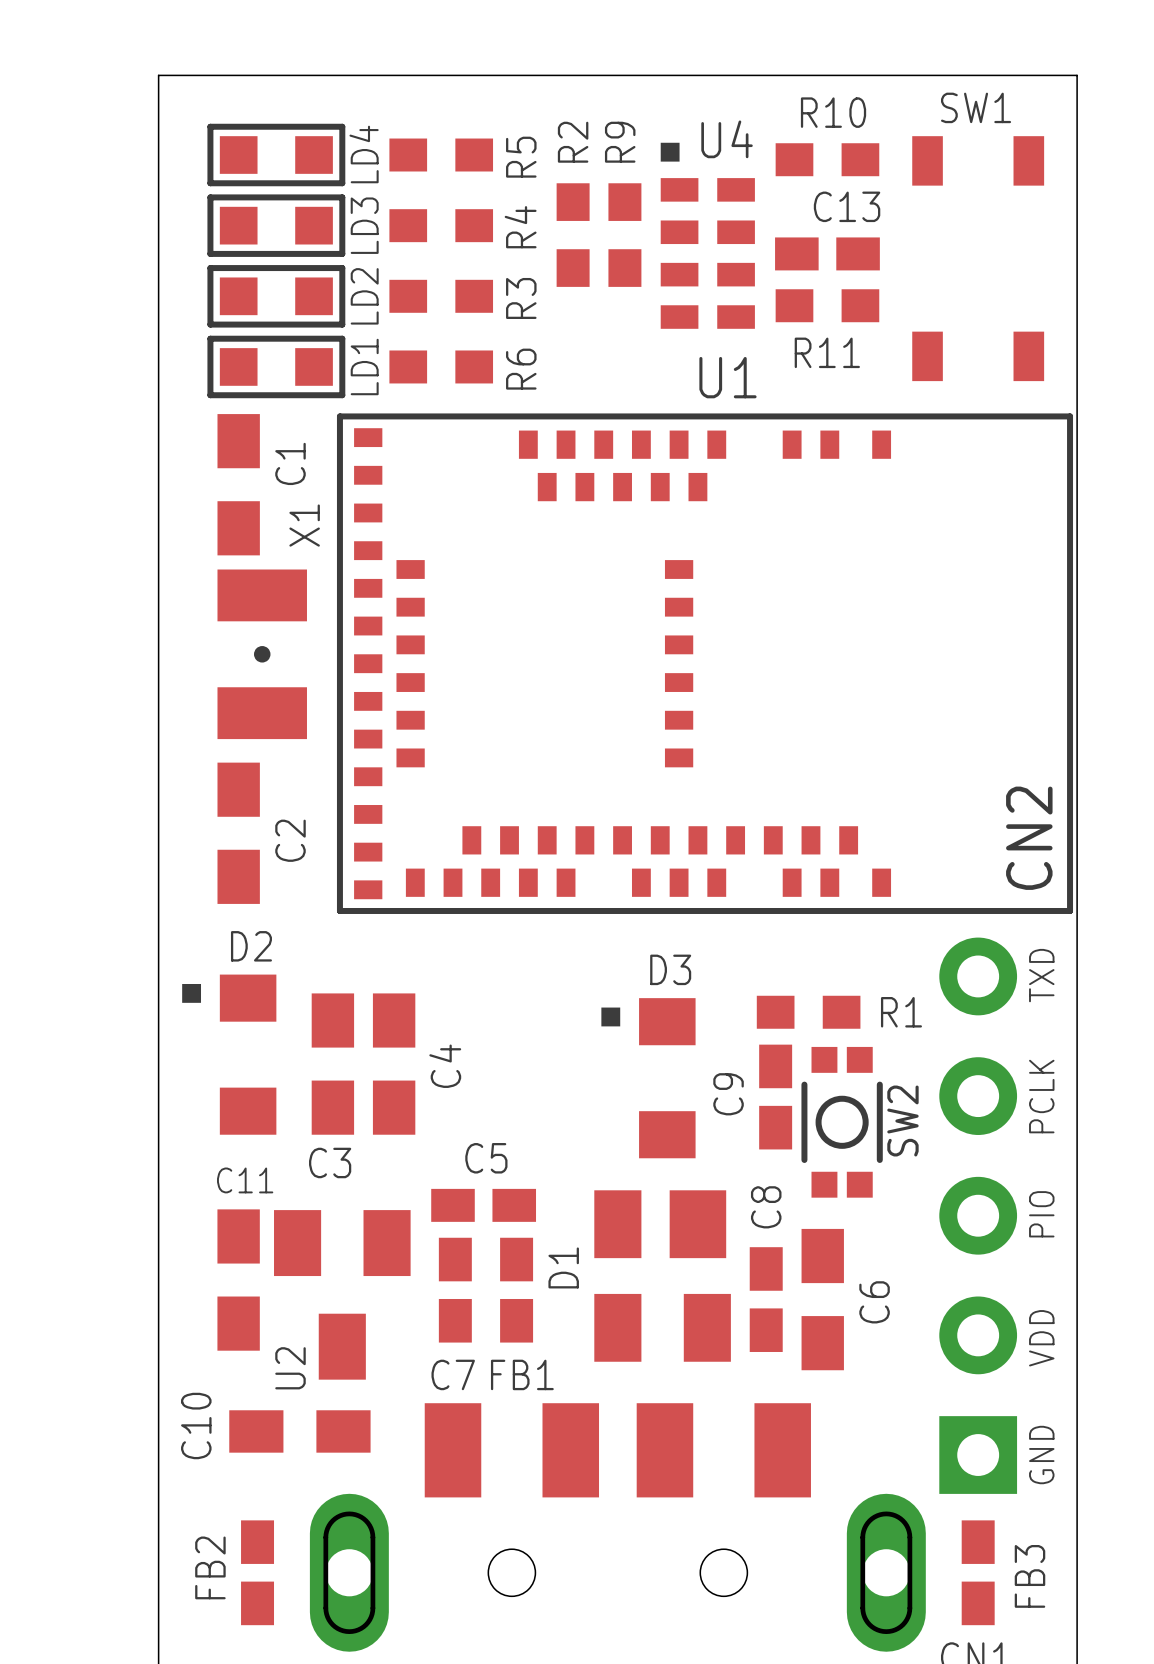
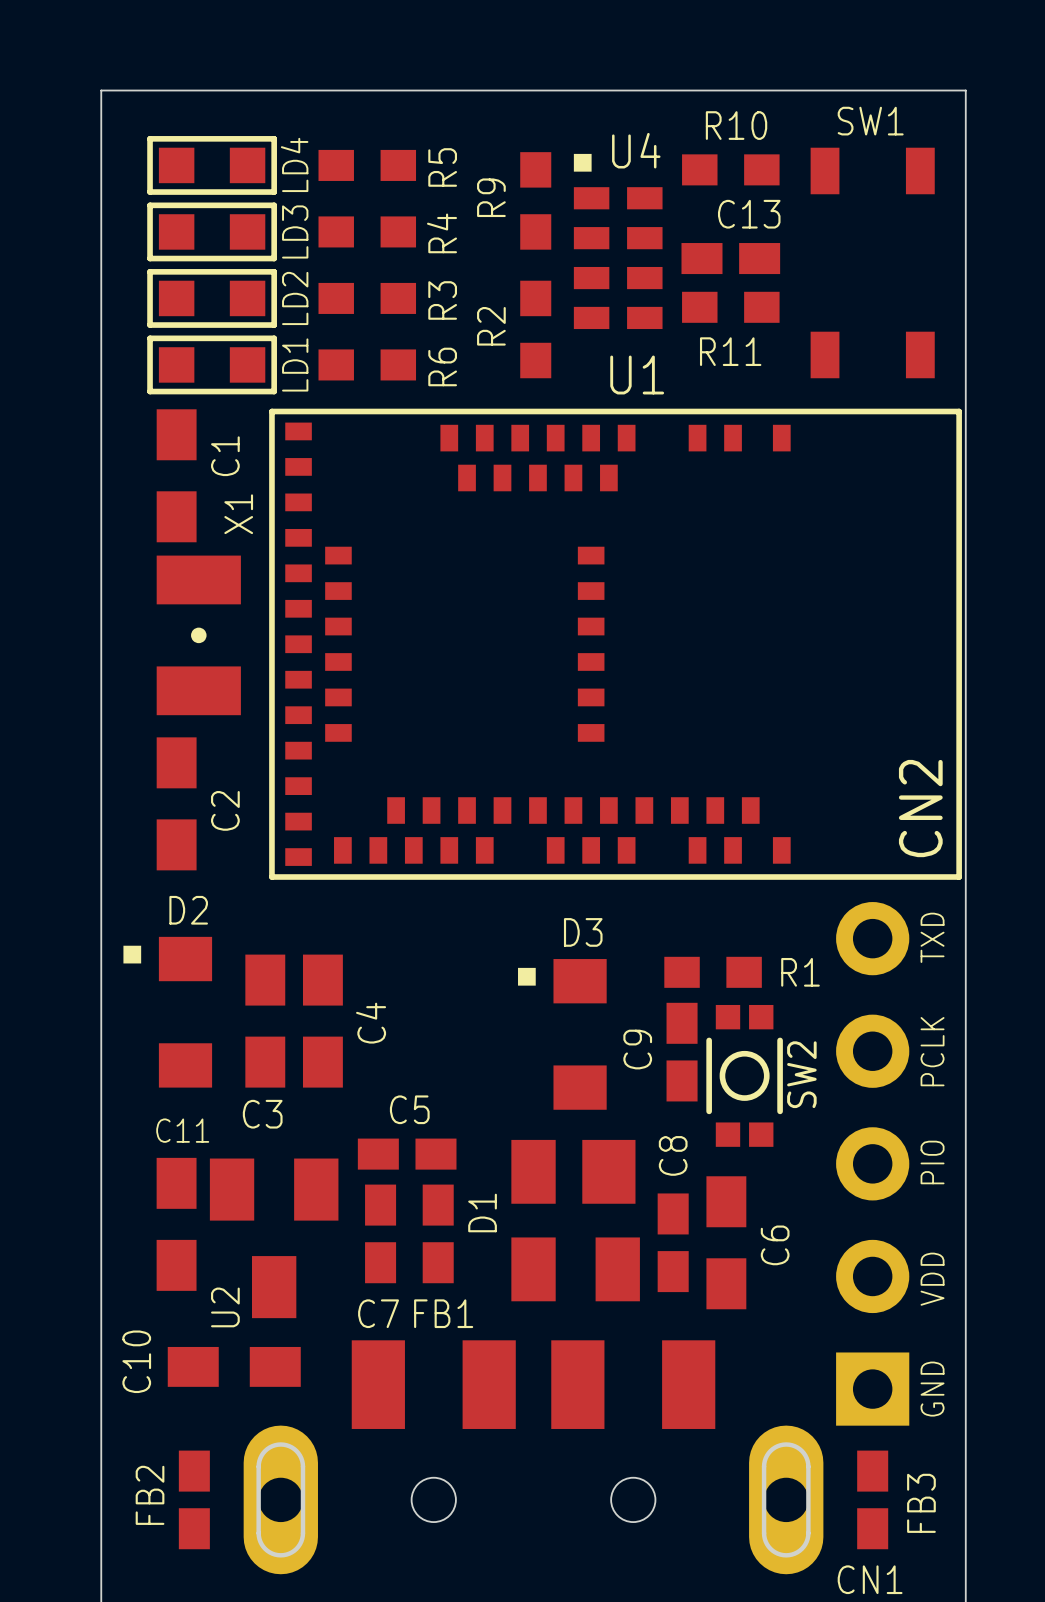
R2 name position: R2 (573, 142) -> R2 (491, 326)
R9 name position: R9 (620, 142) -> R9 (491, 197)
R2 position: (573, 235) -> (535, 329)
R9 position: (624, 235) -> (535, 200)

